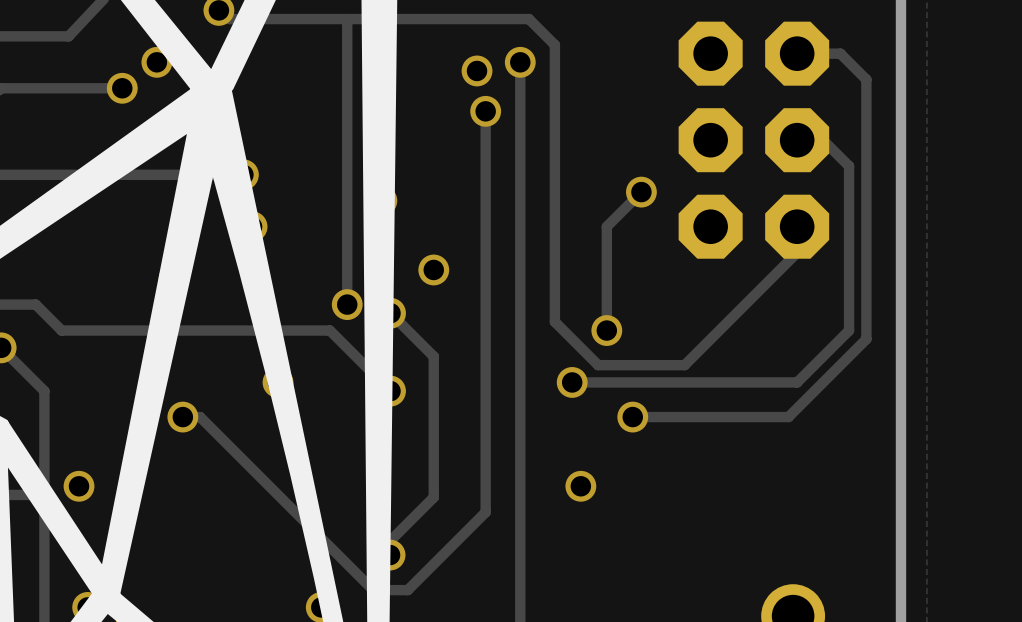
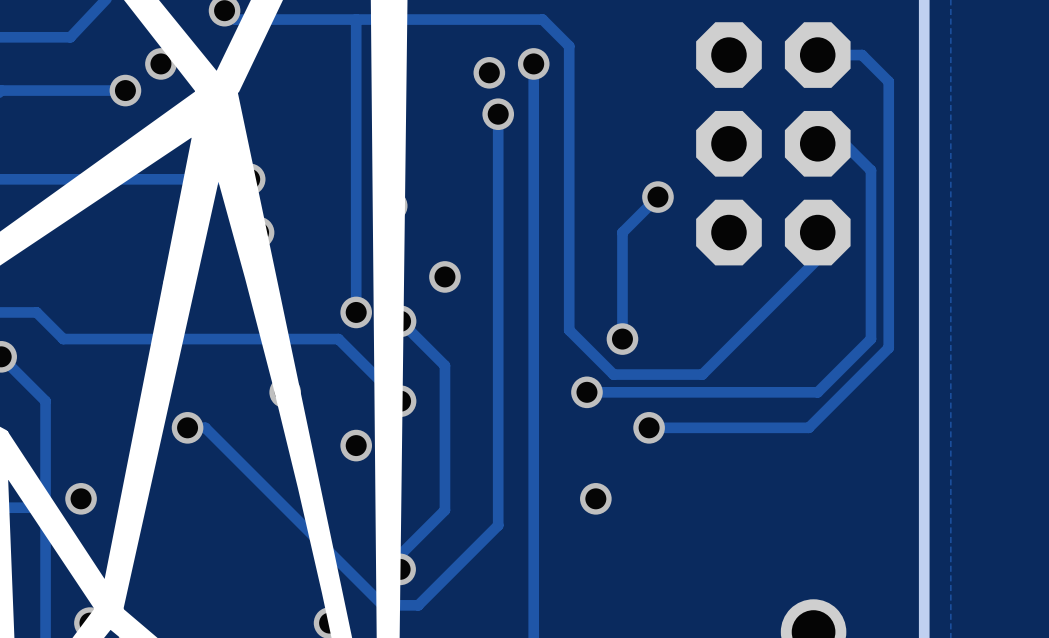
via: none -> (356, 445)

